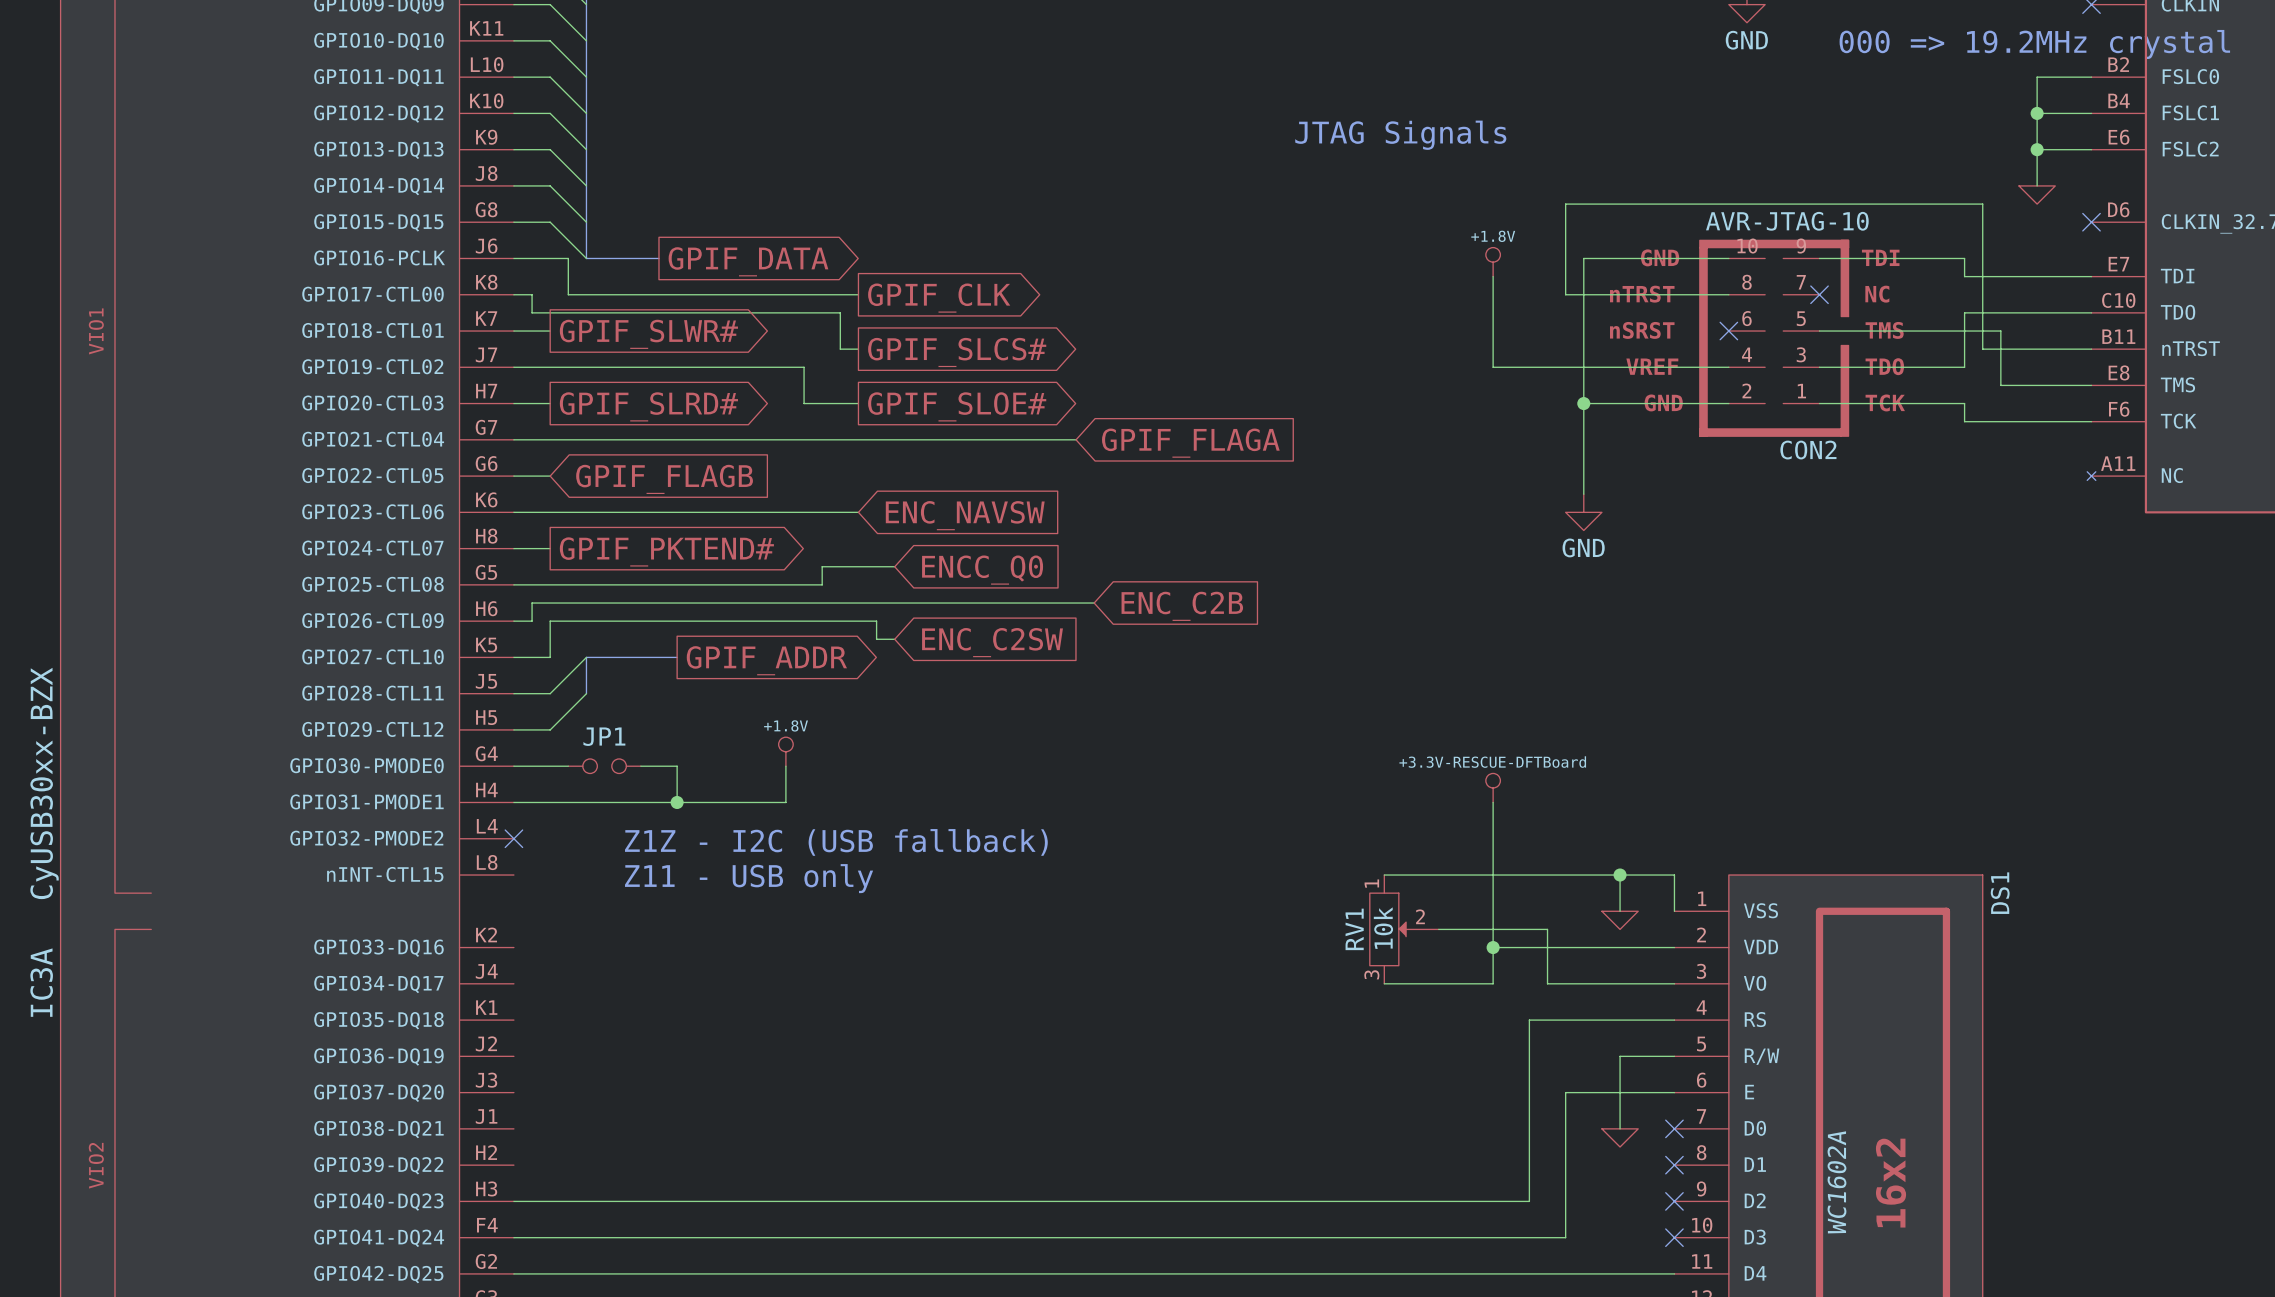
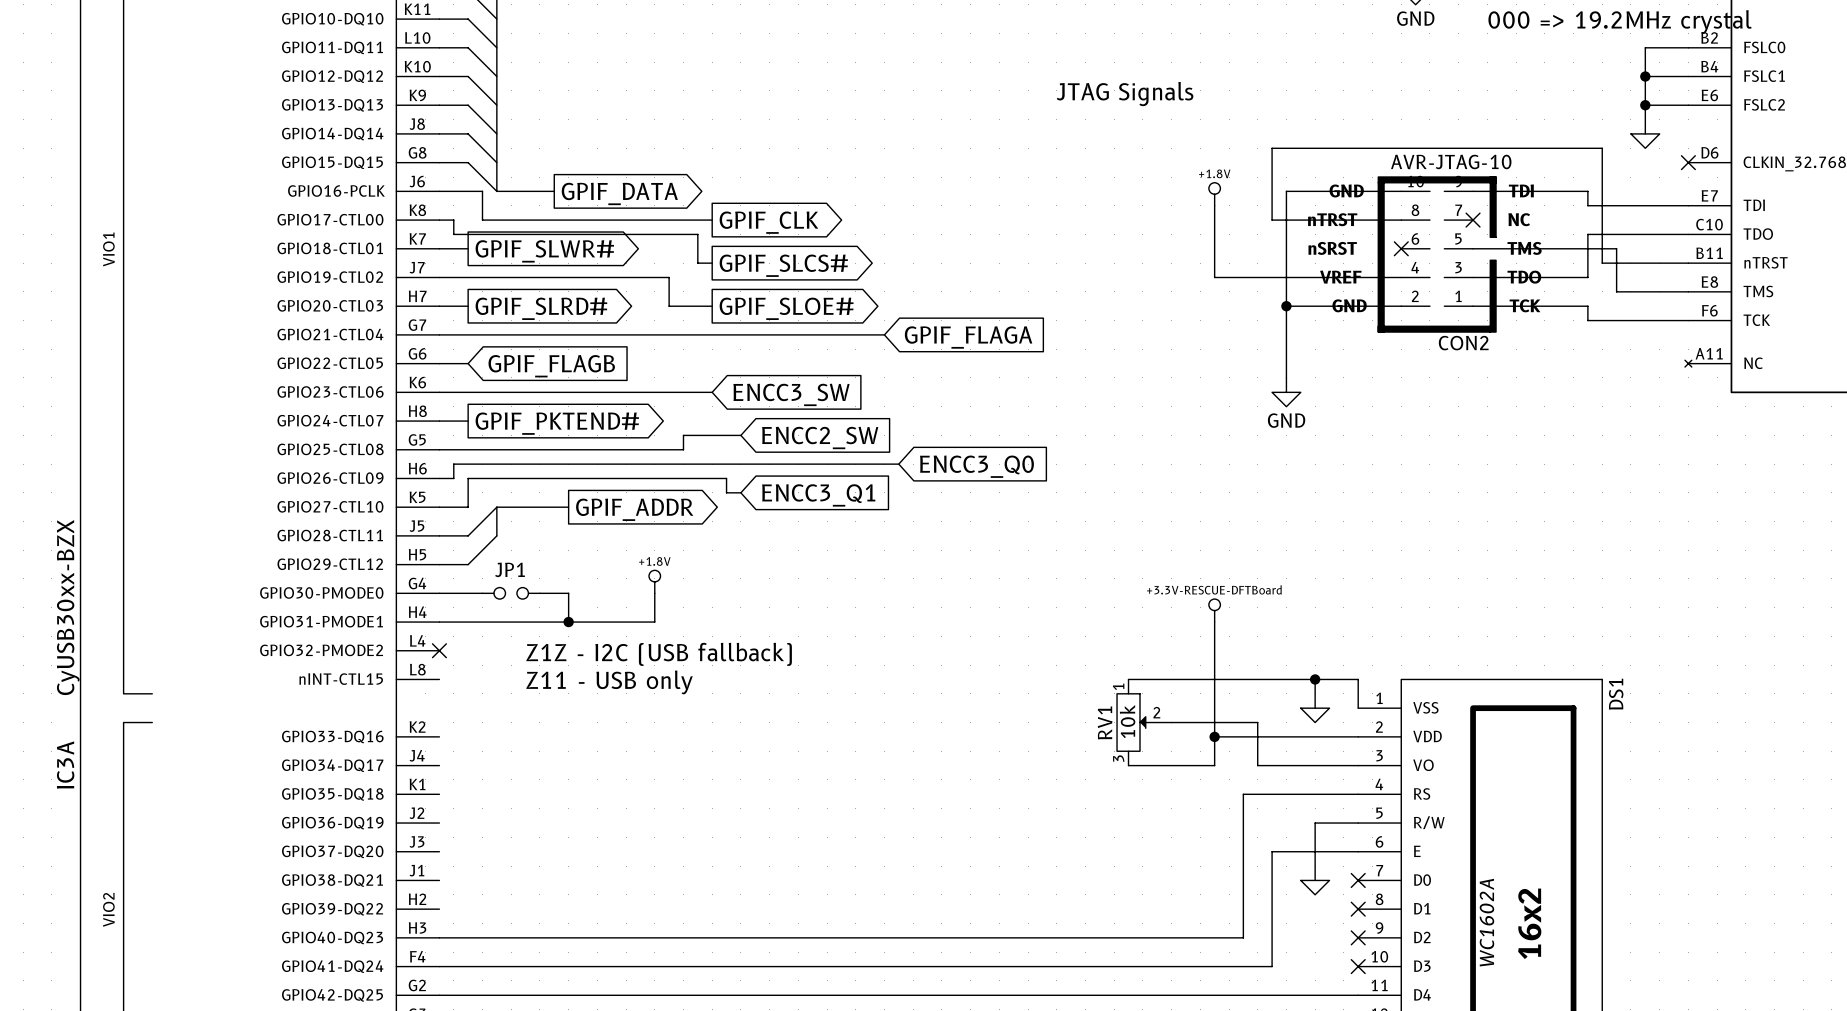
global label: ENC_NAVSW (965, 515) -> ENCC3_SW (791, 394)
global label: ENCC_Q0 (982, 570) -> ENCC2_SW (820, 437)
global label: ENC_C2B (1182, 606) -> ENCC3_Q0 (976, 466)
global label: ENC_C2SW (992, 642) -> ENCC3_Q1 (818, 495)

